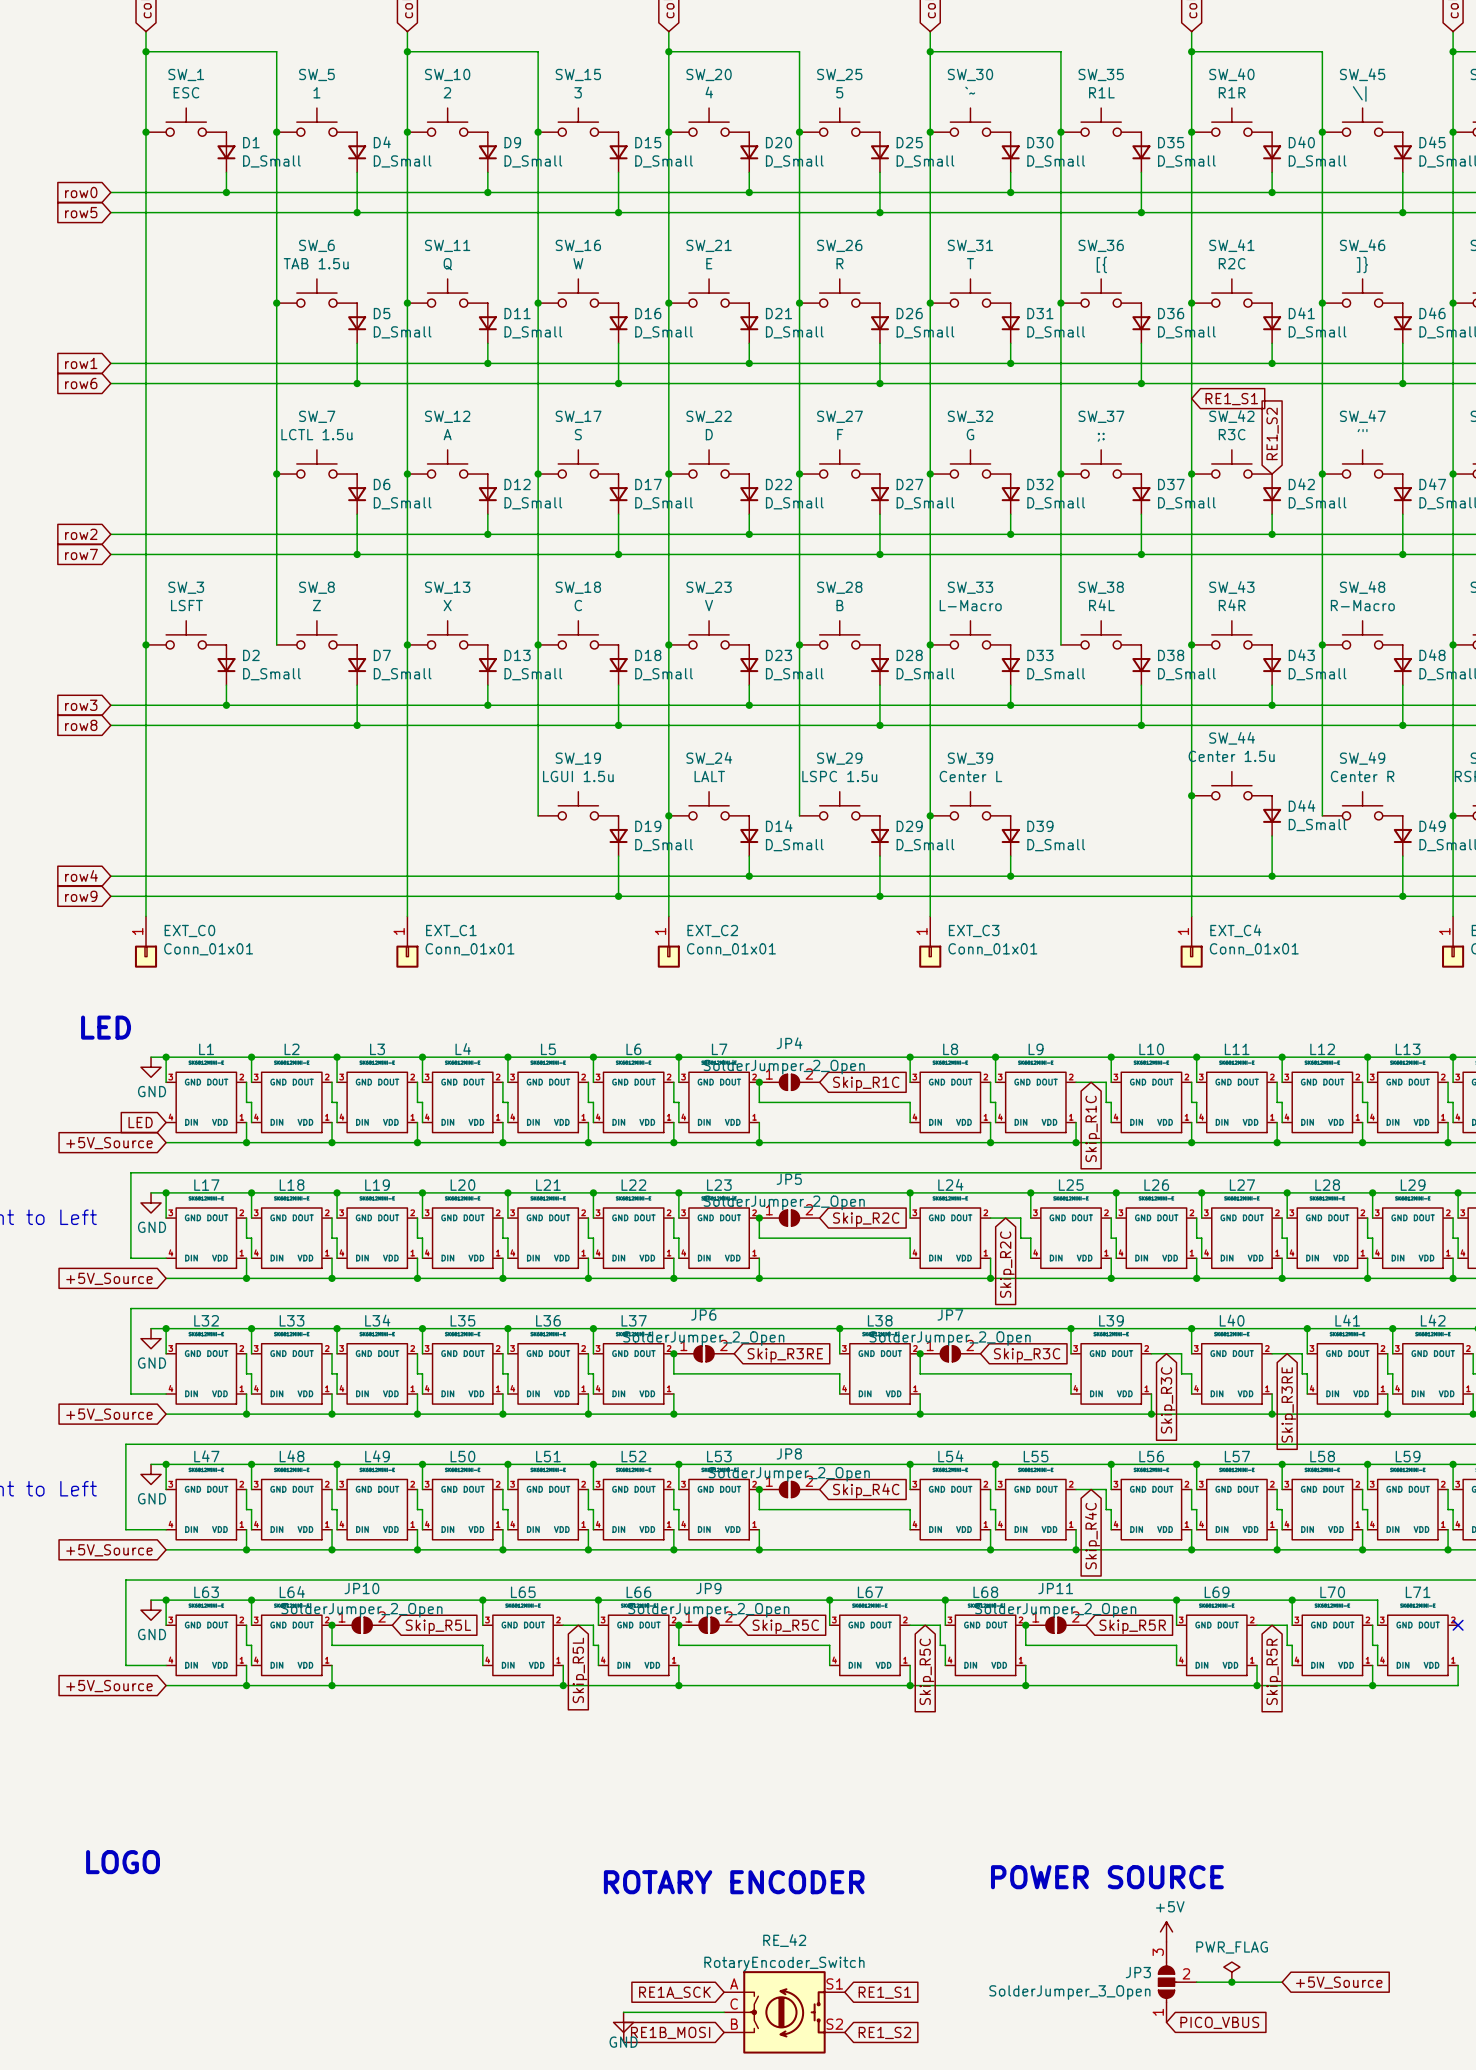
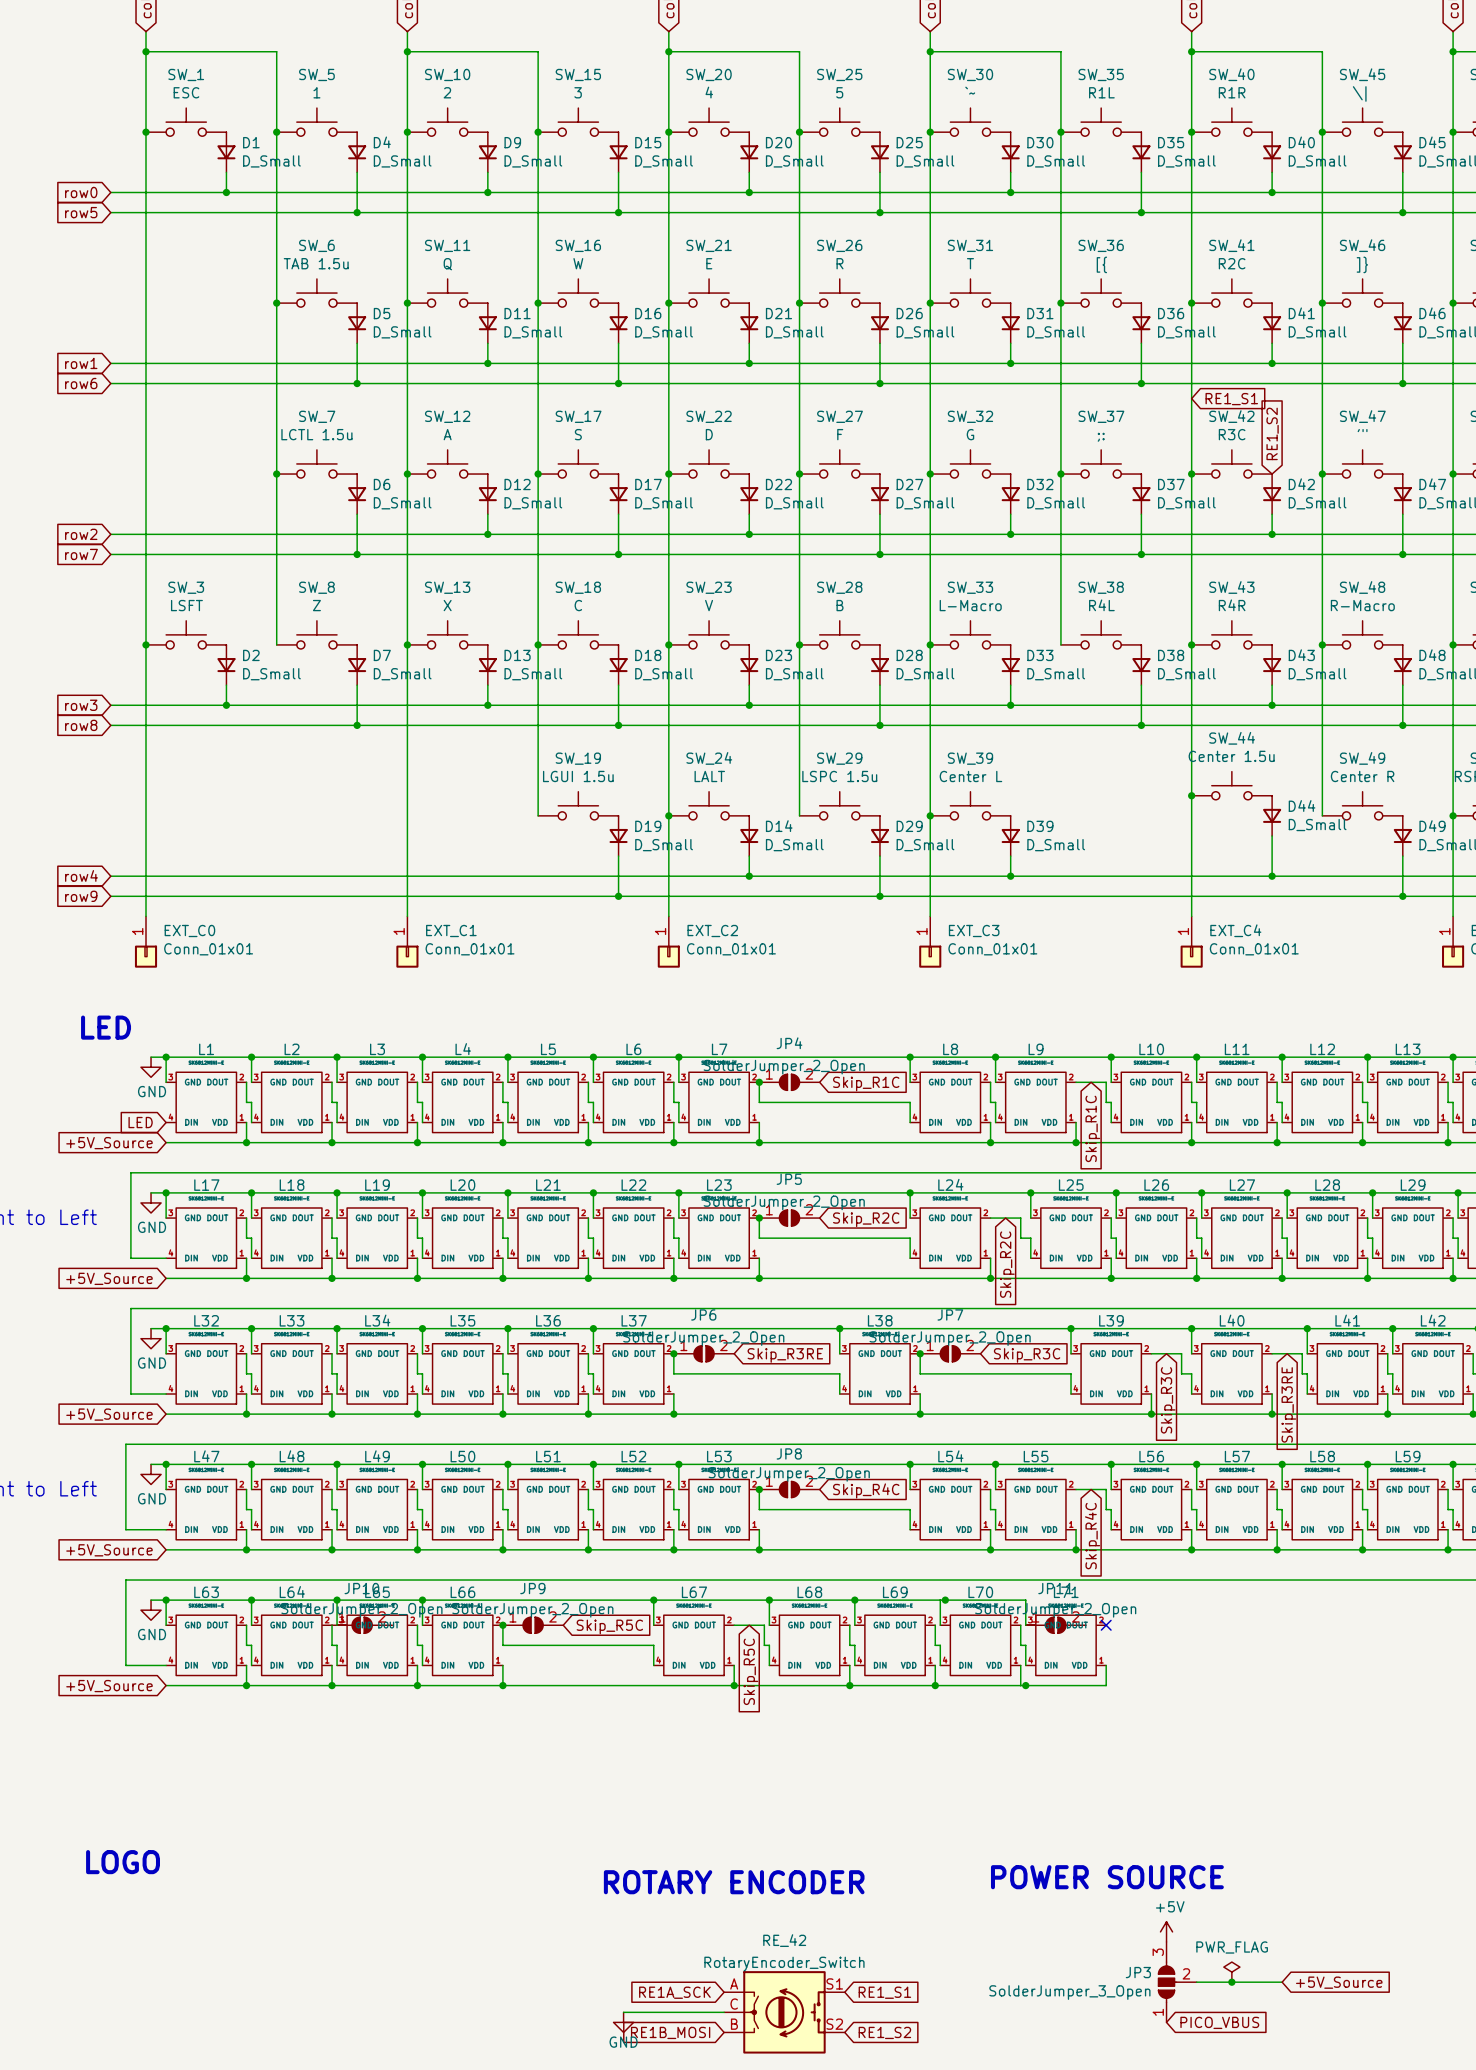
junction: none -> (422, 1600)
wire: (482, 1600) (482, 1625) -> (337, 1600) (337, 1625)
junction: (482, 1600) -> none
wire: (598, 1600) (598, 1625) -> (422, 1600) (422, 1625)
junction: (598, 1600) -> none
junction: none -> (653, 1600)
junction: none -> (769, 1600)
wire: (829, 1600) (829, 1625) -> (653, 1600) (653, 1625)
junction position: (829, 1600) -> (854, 1600)
wire: none -> (854, 1600) (854, 1625)
wire: none -> (940, 1600) (940, 1625)
wire: (945, 1600) (945, 1625) -> (769, 1600) (769, 1625)
wire: (1025, 1600) (1377, 1600) (1377, 1625) -> none
wire: (1176, 1600) (1176, 1625) -> none
junction: (1176, 1600) -> none
wire: (1292, 1600) (1292, 1625) -> none
junction: (1292, 1600) -> none
junction position: (332, 1625) -> (337, 1600)
wire: none -> (417, 1625) (417, 1645)
junction: none -> (502, 1625)
wire: (563, 1625) (593, 1625) (593, 1645) -> (502, 1625) (502, 1645) (593, 1645)
wire: (678, 1625) (678, 1645) (764, 1645) -> (734, 1625) (764, 1625) (764, 1645)
junction: (678, 1625) -> none
JP9 position: (709, 1625) -> (533, 1625)
wire: none -> (849, 1625) (849, 1645) (854, 1645) (854, 1665)
wire: (910, 1625) (940, 1625) (940, 1645) (945, 1645) (945, 1665) -> none
wire: none -> (935, 1625) (935, 1645) (940, 1645) (940, 1665)
wire: (1025, 1625) (1025, 1645) (1176, 1645) (1176, 1665) -> (1025, 1625) (1025, 1600)
junction: (1025, 1625) -> none
no-connect mark: none -> (1106, 1625)
wire: (1257, 1625) (1287, 1625) (1287, 1645) (1292, 1645) (1292, 1665) -> none
wire: (1372, 1625) (1372, 1645) (1377, 1645) (1377, 1665) -> none
no-connect mark: (1458, 1625) -> none
global label: Skip_R5L (438, 1626) -> none
global label rotation: 0° (785, 1626) -> 90° clockwise (750, 1671)
global label: Skip_R5R (1132, 1626) -> none
wire: (337, 1645) (417, 1645) -> (337, 1645) (337, 1665)
wire: (422, 1645) (482, 1645) (482, 1665) -> (422, 1645) (422, 1665)
L65 position: (523, 1645) -> (377, 1645)
wire: (598, 1645) (598, 1665) -> (598, 1645) (653, 1645) (653, 1665)
L66 position: (638, 1645) -> (462, 1645)
wire: (769, 1645) (829, 1645) (829, 1665) -> (769, 1645) (769, 1665)
L67 position: (869, 1645) -> (693, 1645)
L68 position: (985, 1645) -> (809, 1645)
L69 position: (1216, 1645) -> (895, 1645)
L70 position: (1332, 1645) -> (980, 1645)
L71 position: (1417, 1645) -> (1065, 1645)
wire: (563, 1665) (563, 1685) -> (417, 1665) (417, 1685)
wire: (678, 1665) (678, 1685) -> (502, 1665) (502, 1685)
wire: none -> (849, 1665) (849, 1685)
wire: (910, 1665) (910, 1685) -> (734, 1665) (734, 1685)
wire: none -> (1020, 1665) (1020, 1685)
wire: (1025, 1665) (1025, 1685) -> (1025, 1665) (1025, 1645) (1020, 1645) (1020, 1625)
wire: (1257, 1665) (1257, 1685) -> none
wire: (1372, 1665) (1372, 1685) -> none
wire: (1458, 1665) (1458, 1685) (1106, 1685) -> (1106, 1665) (1106, 1685)
global label: Skip_R5L (580, 1670) -> Skip_R5C (609, 1626)
global label: Skip_R5C (926, 1671) -> none
global label: Skip_R5R (1273, 1671) -> none
junction: none -> (417, 1685)
junction: none -> (502, 1685)
junction: (563, 1685) -> none
junction: (678, 1685) -> none
junction: none -> (734, 1685)
junction: none -> (849, 1685)
junction position: (910, 1685) -> (935, 1685)
junction: (1257, 1685) -> none
junction: (1372, 1685) -> none

